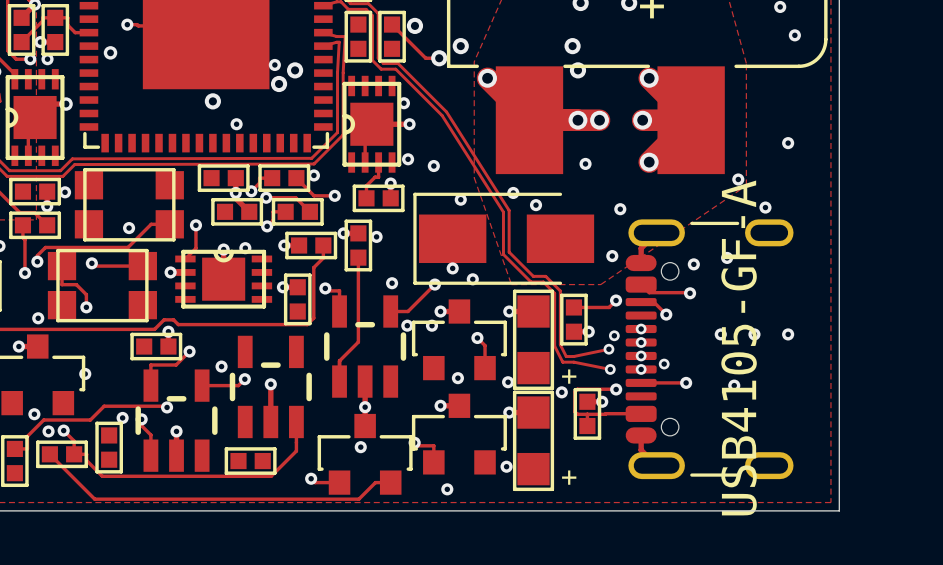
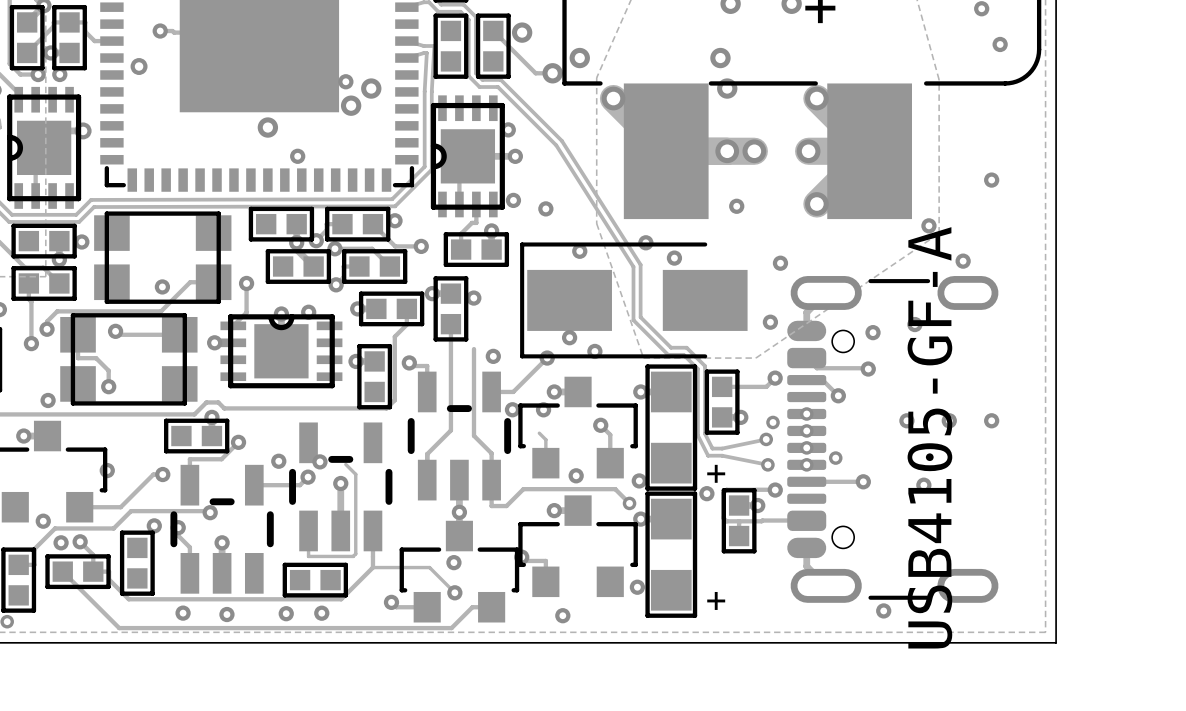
track: none -> (473, 349) (473, 435) (491, 453) (491, 506) (506, 506) (523, 489) (615, 489) (629, 503)
track: none -> (539, 433) (545, 439) (545, 463)
via: none -> (319, 461)
track: none -> (345, 464) (355, 474) (355, 553) (353, 556) (308, 556) (308, 530)
track: none -> (162, 474) (153, 474) (120, 507) (79, 507)
via: none -> (162, 474)
via: none -> (629, 503)
track: none -> (372, 567) (429, 567) (454, 592)
via: none -> (454, 592)
via: none -> (883, 610)
via: none -> (183, 613)
via: none -> (286, 613)
via: none -> (321, 613)
via: none -> (226, 614)
via: none -> (7, 621)

